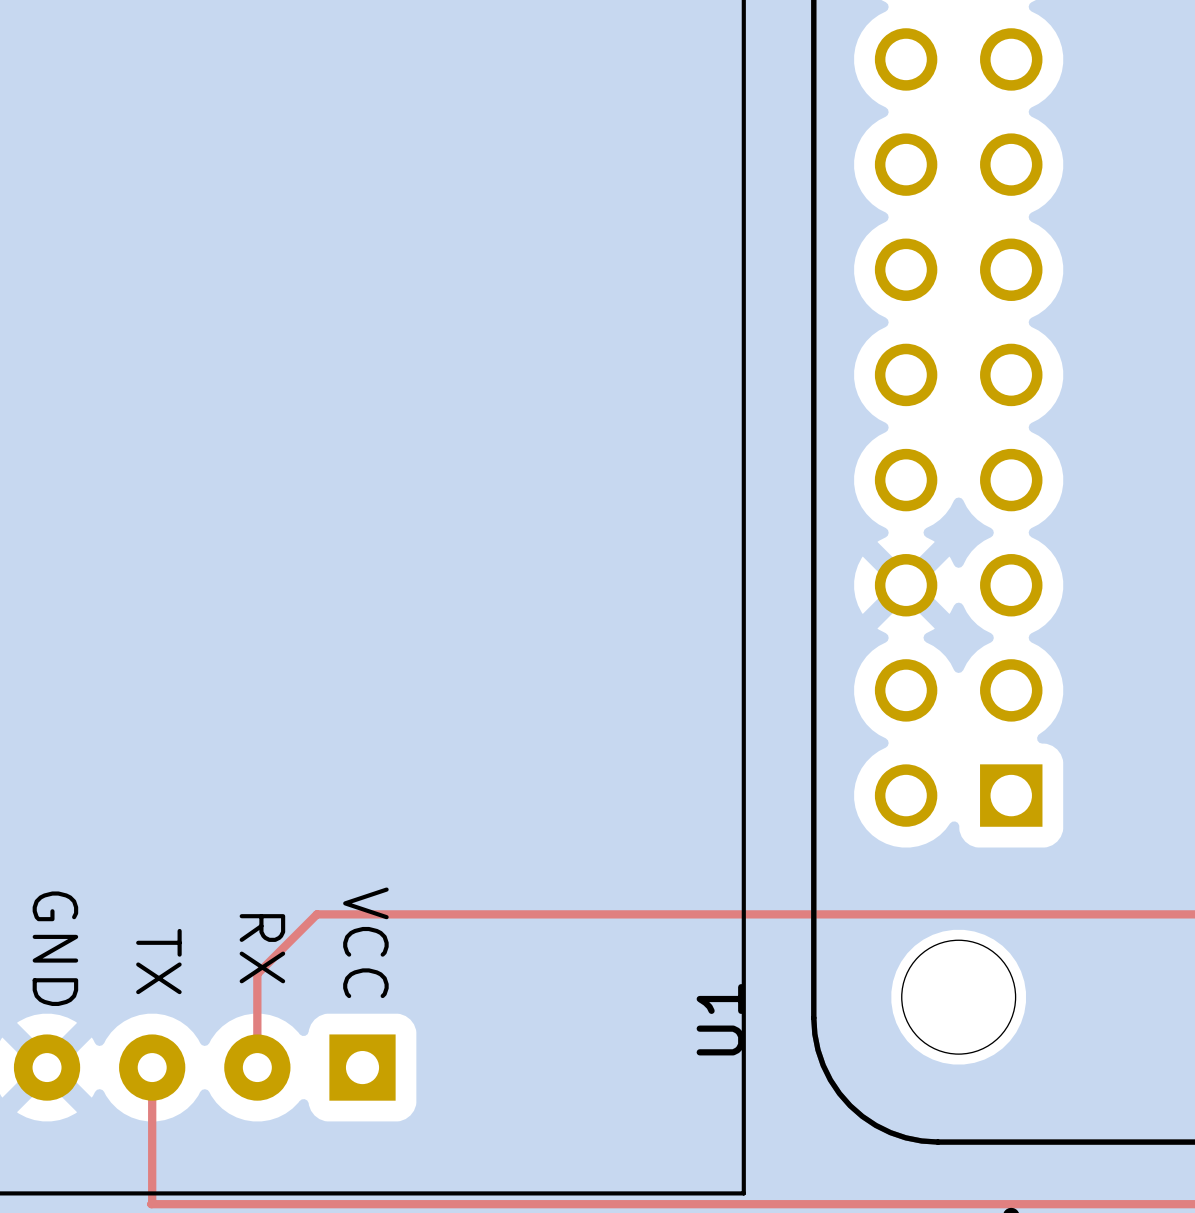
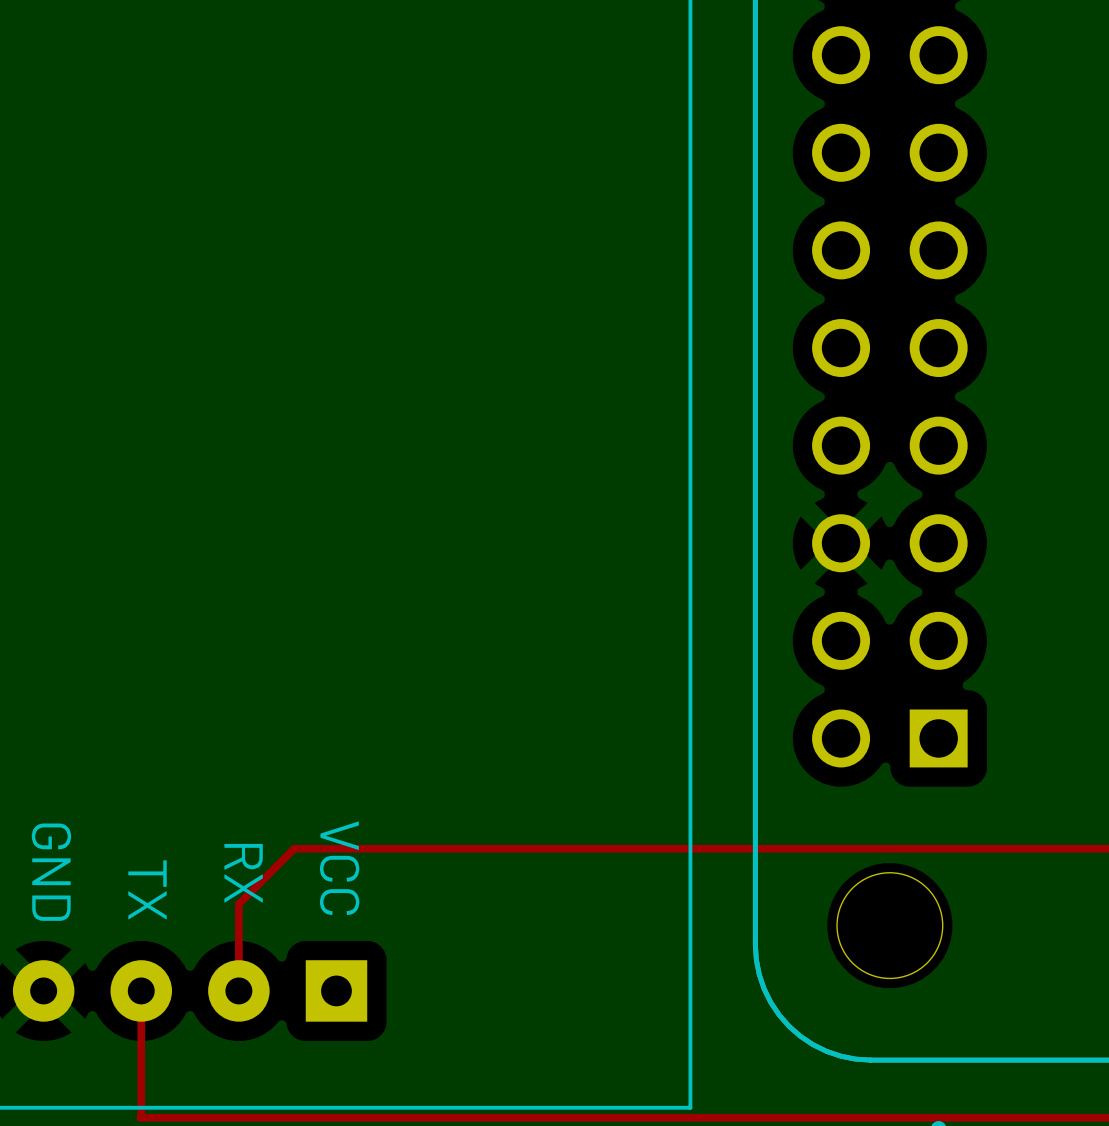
U1 name: U1 (720, 1019) -> none

